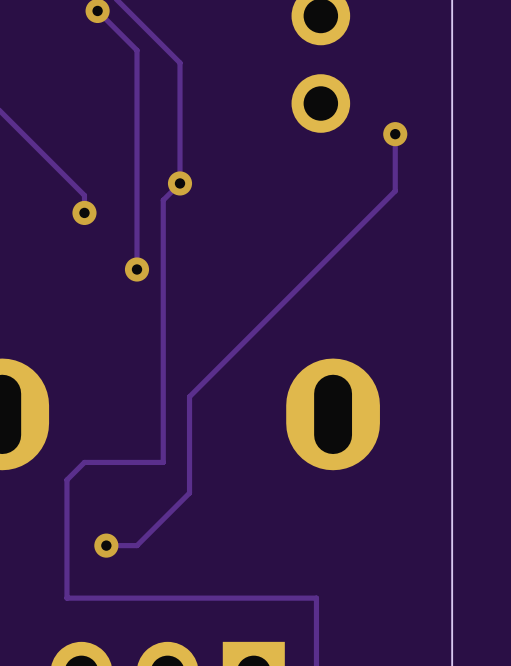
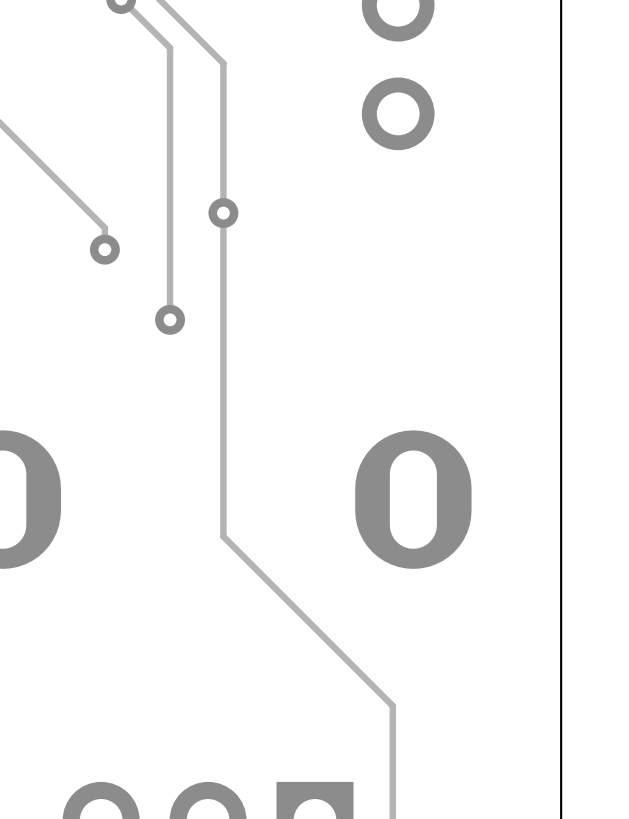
track: (395, 134) (395, 191) (189, 396) (189, 493) (137, 545) (106, 545) -> none
via: (395, 134) -> none
track: (180, 183) (163, 200) (163, 462) (84, 462) (66, 479) (66, 598) (316, 598) -> (223, 213) (223, 536) (392, 705) (392, 727)
via: (106, 545) -> none

